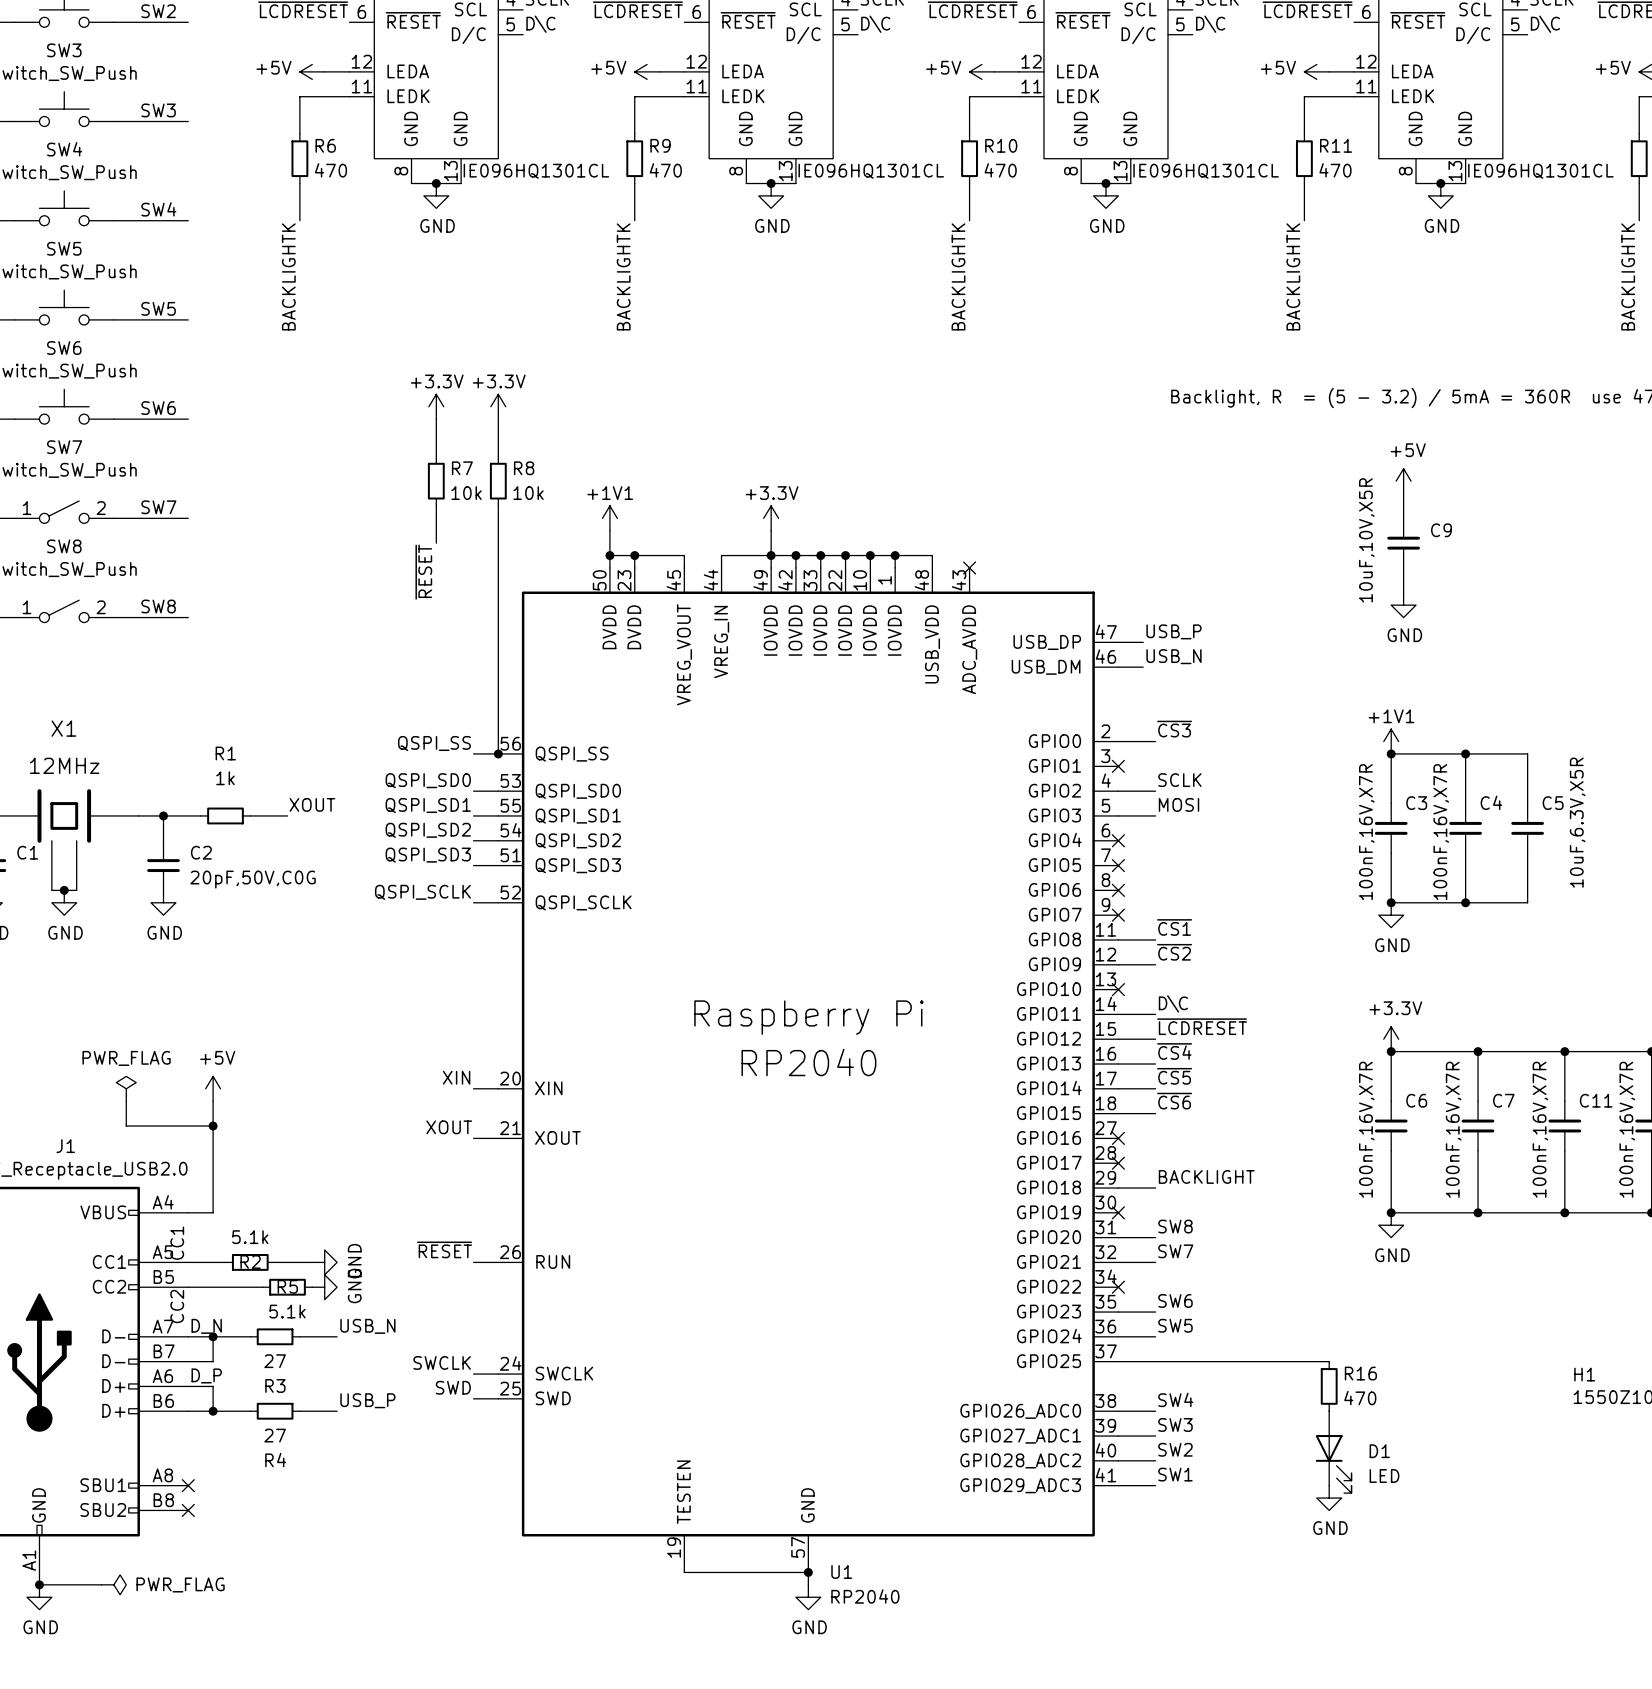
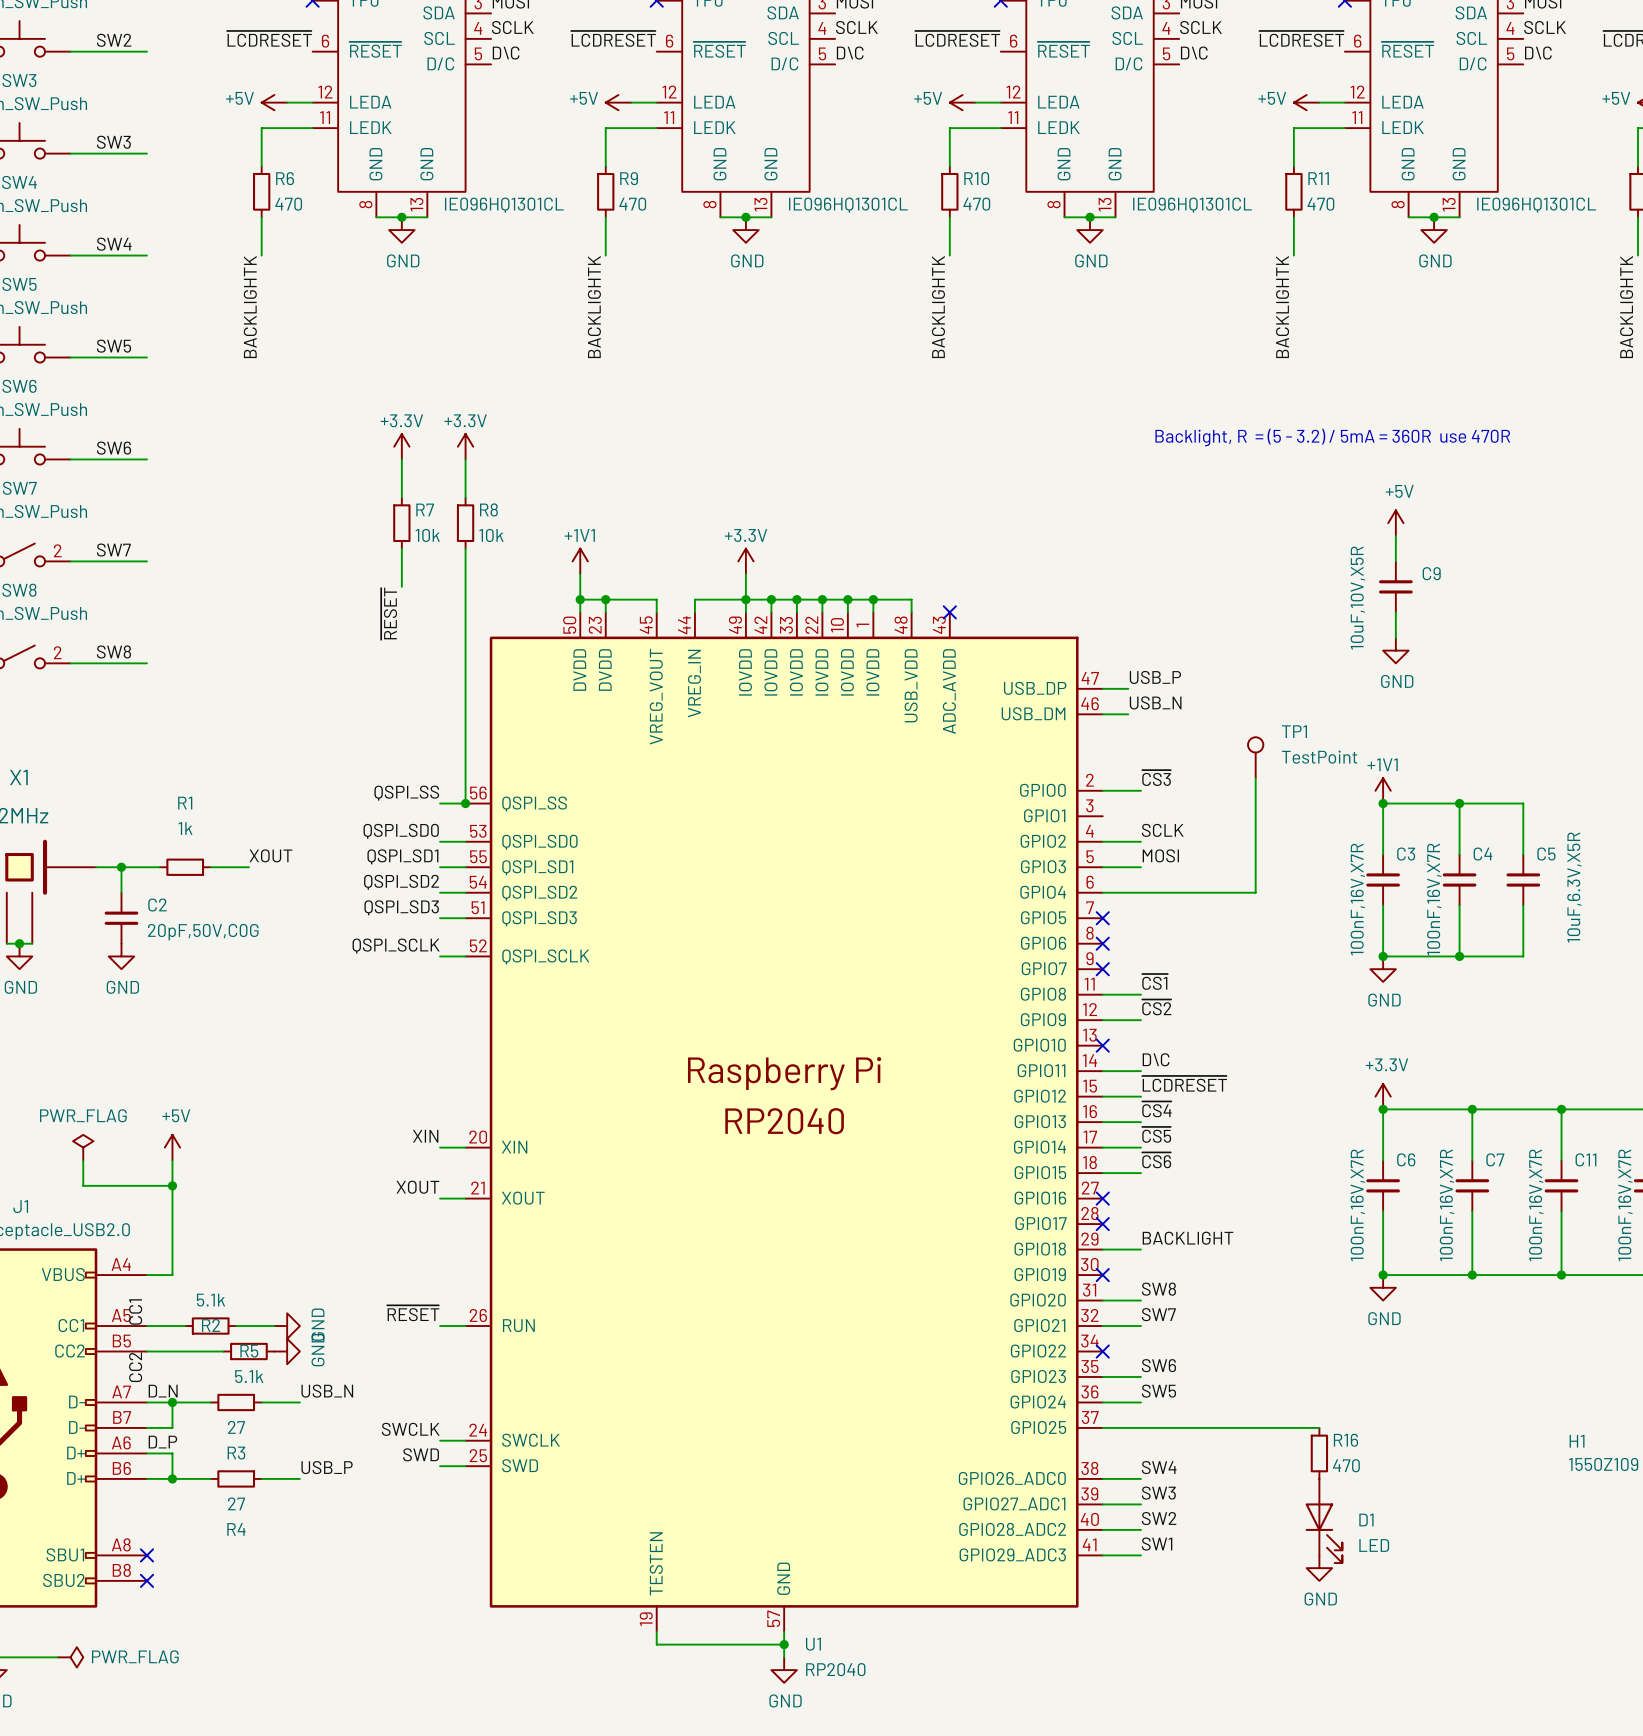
TP1: none -> TestPoint (1255, 757)
wire: none -> (1255, 778) (1255, 892) (1102, 892)
no-connect mark: (1118, 766) -> none
no-connect mark: (1118, 840) -> none

